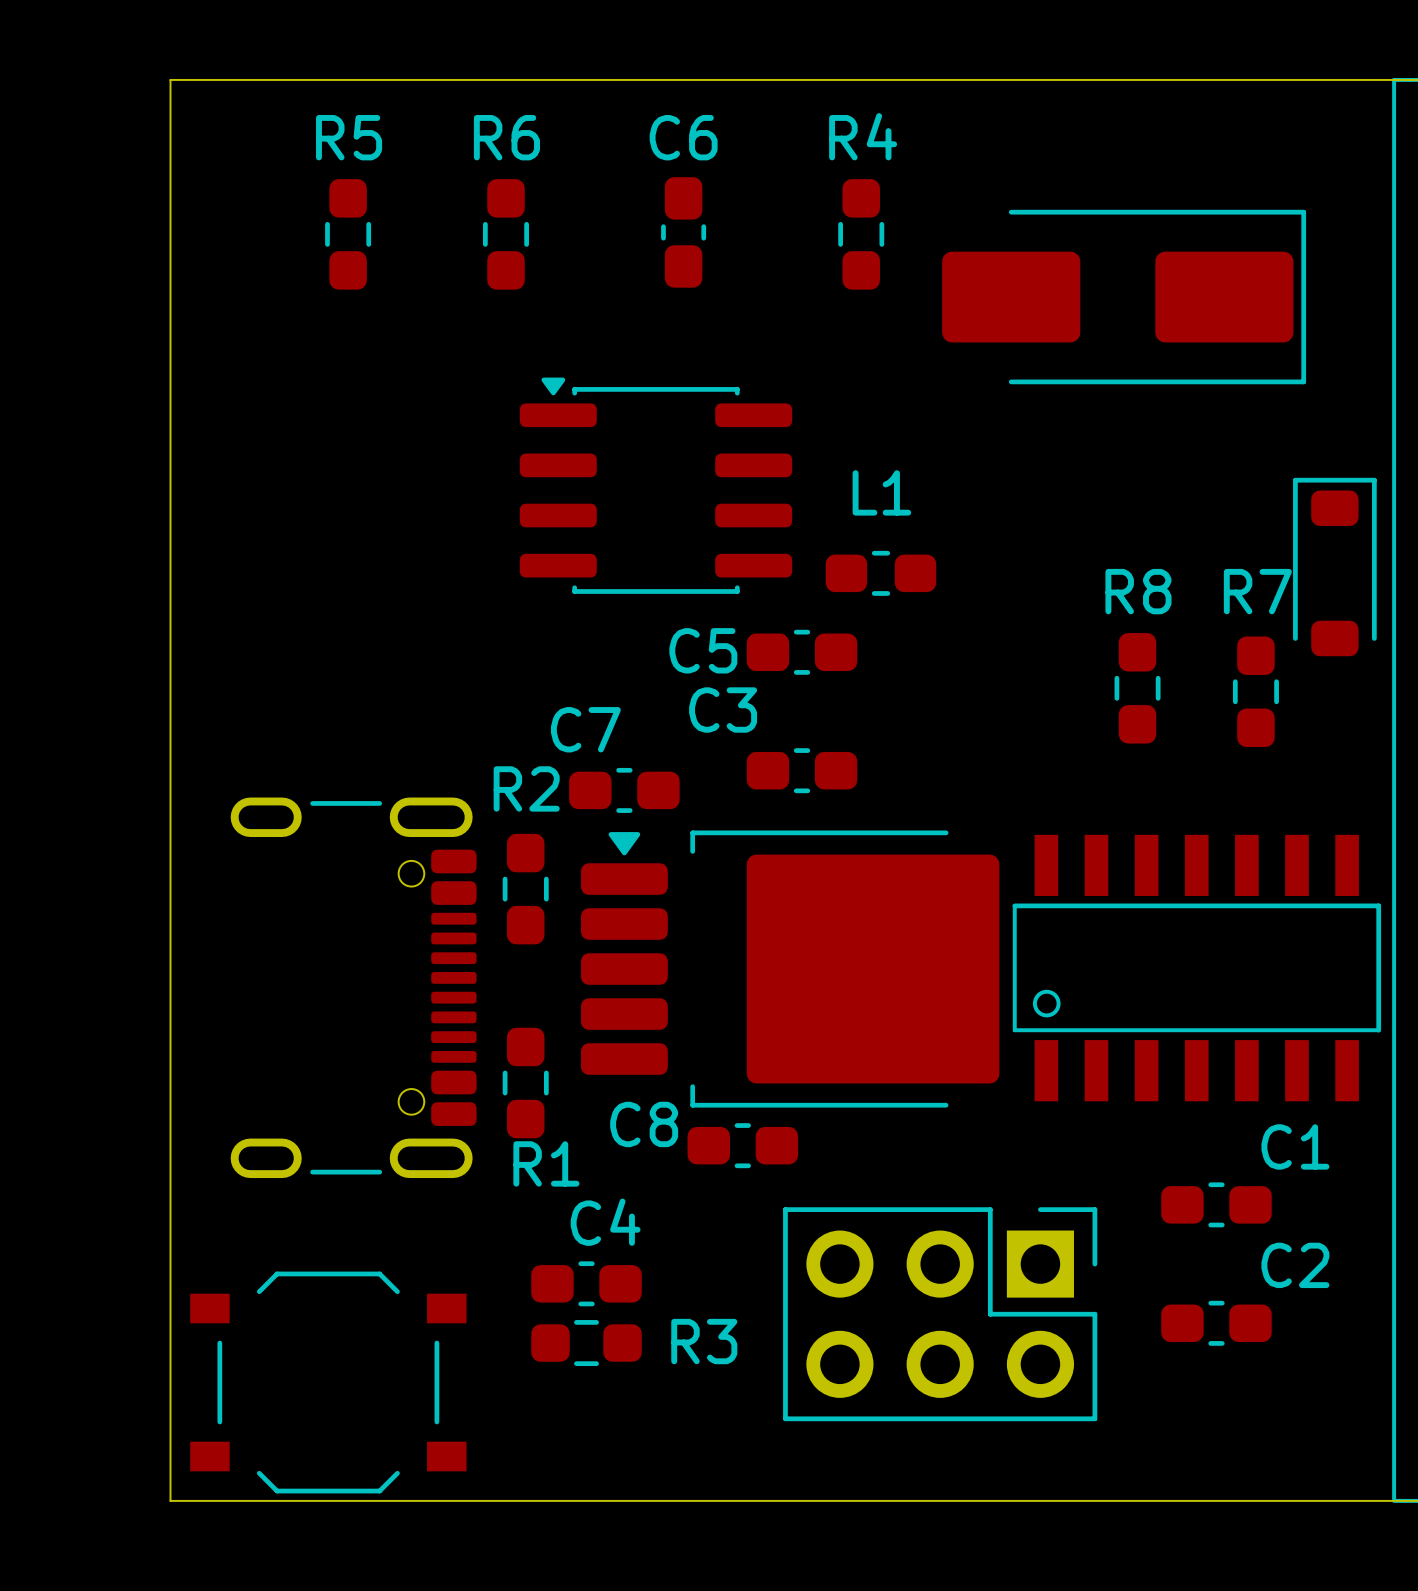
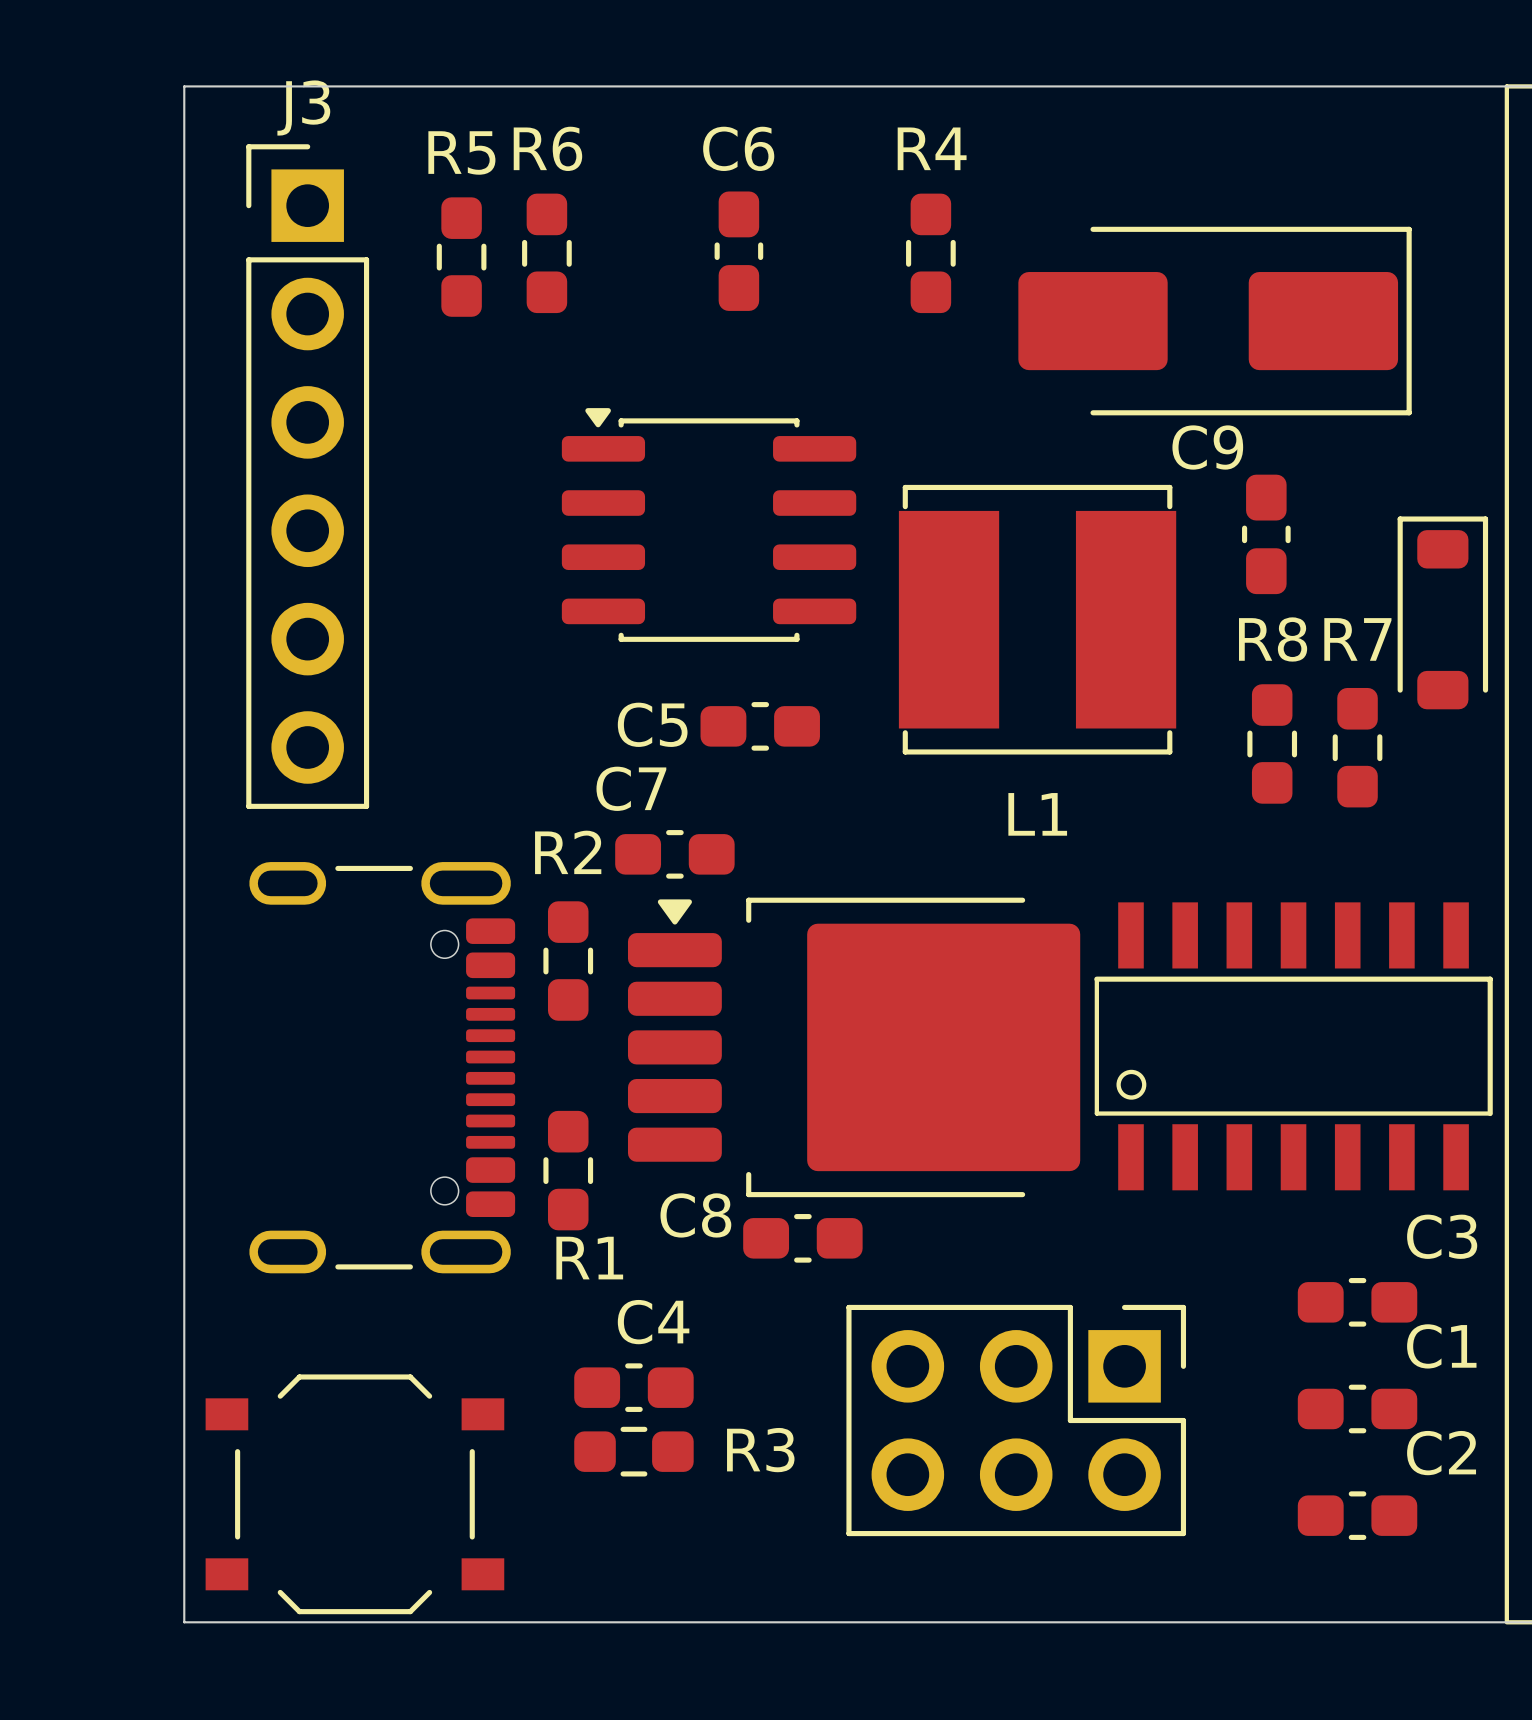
R5 position: (348, 234) -> (461, 257)
J3: none -> (307, 476)
L1 name position: L1 (881, 492) -> L1 (1037, 814)
C9: none -> (1266, 534)
L1 footprint: [825, 550, 937, 596] -> [898, 484, 1177, 755]
C5 position: (802, 652) -> (760, 726)
R8 position: (1137, 688) -> (1272, 743)
C3 name position: C3 (723, 710) -> C3 (1442, 1236)
C3 position: (802, 770) -> (1357, 1302)
C1 position: (1216, 1204) -> (1357, 1408)
C2 position: (1216, 1323) -> (1357, 1515)

